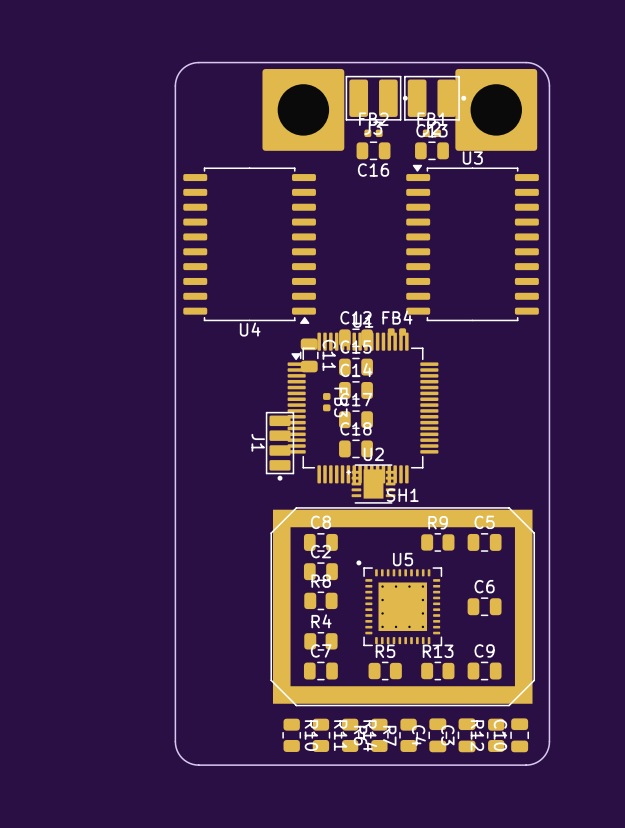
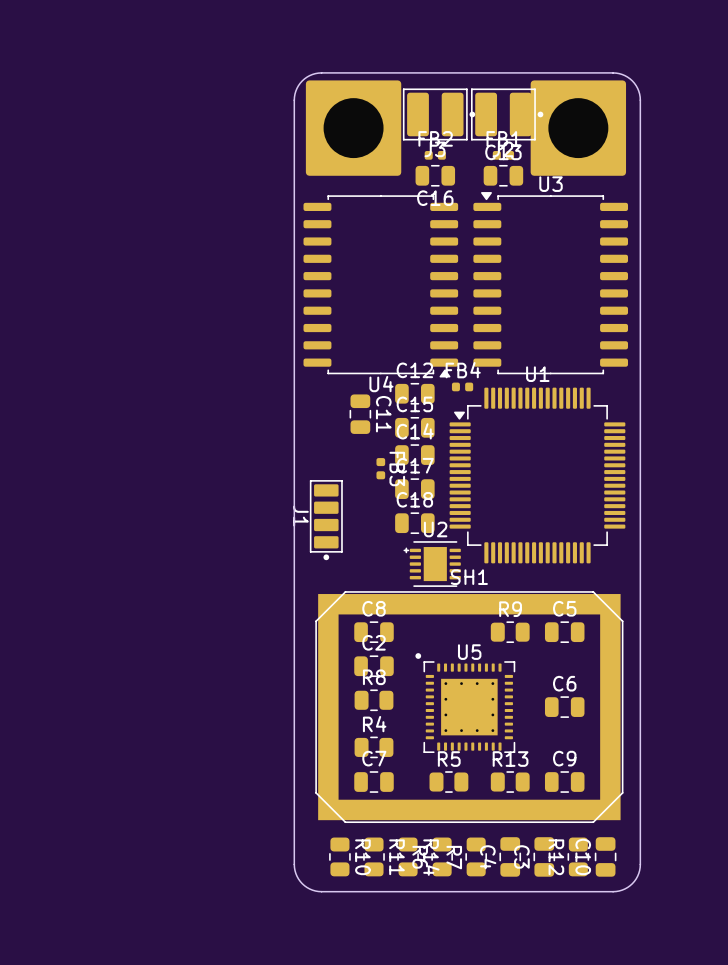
board edge: (275, 62) (193, 63) (180, 71) (175, 85) (175, 744) (180, 755) (192, 764) (275, 765) -> (321, 72) (312, 74) (302, 80) (297, 88) (294, 100) (294, 864) (297, 876) (302, 883) (312, 890) (321, 891)
U4 position: (249, 245) -> (380, 286)
U1 position: (363, 408) -> (537, 475)

